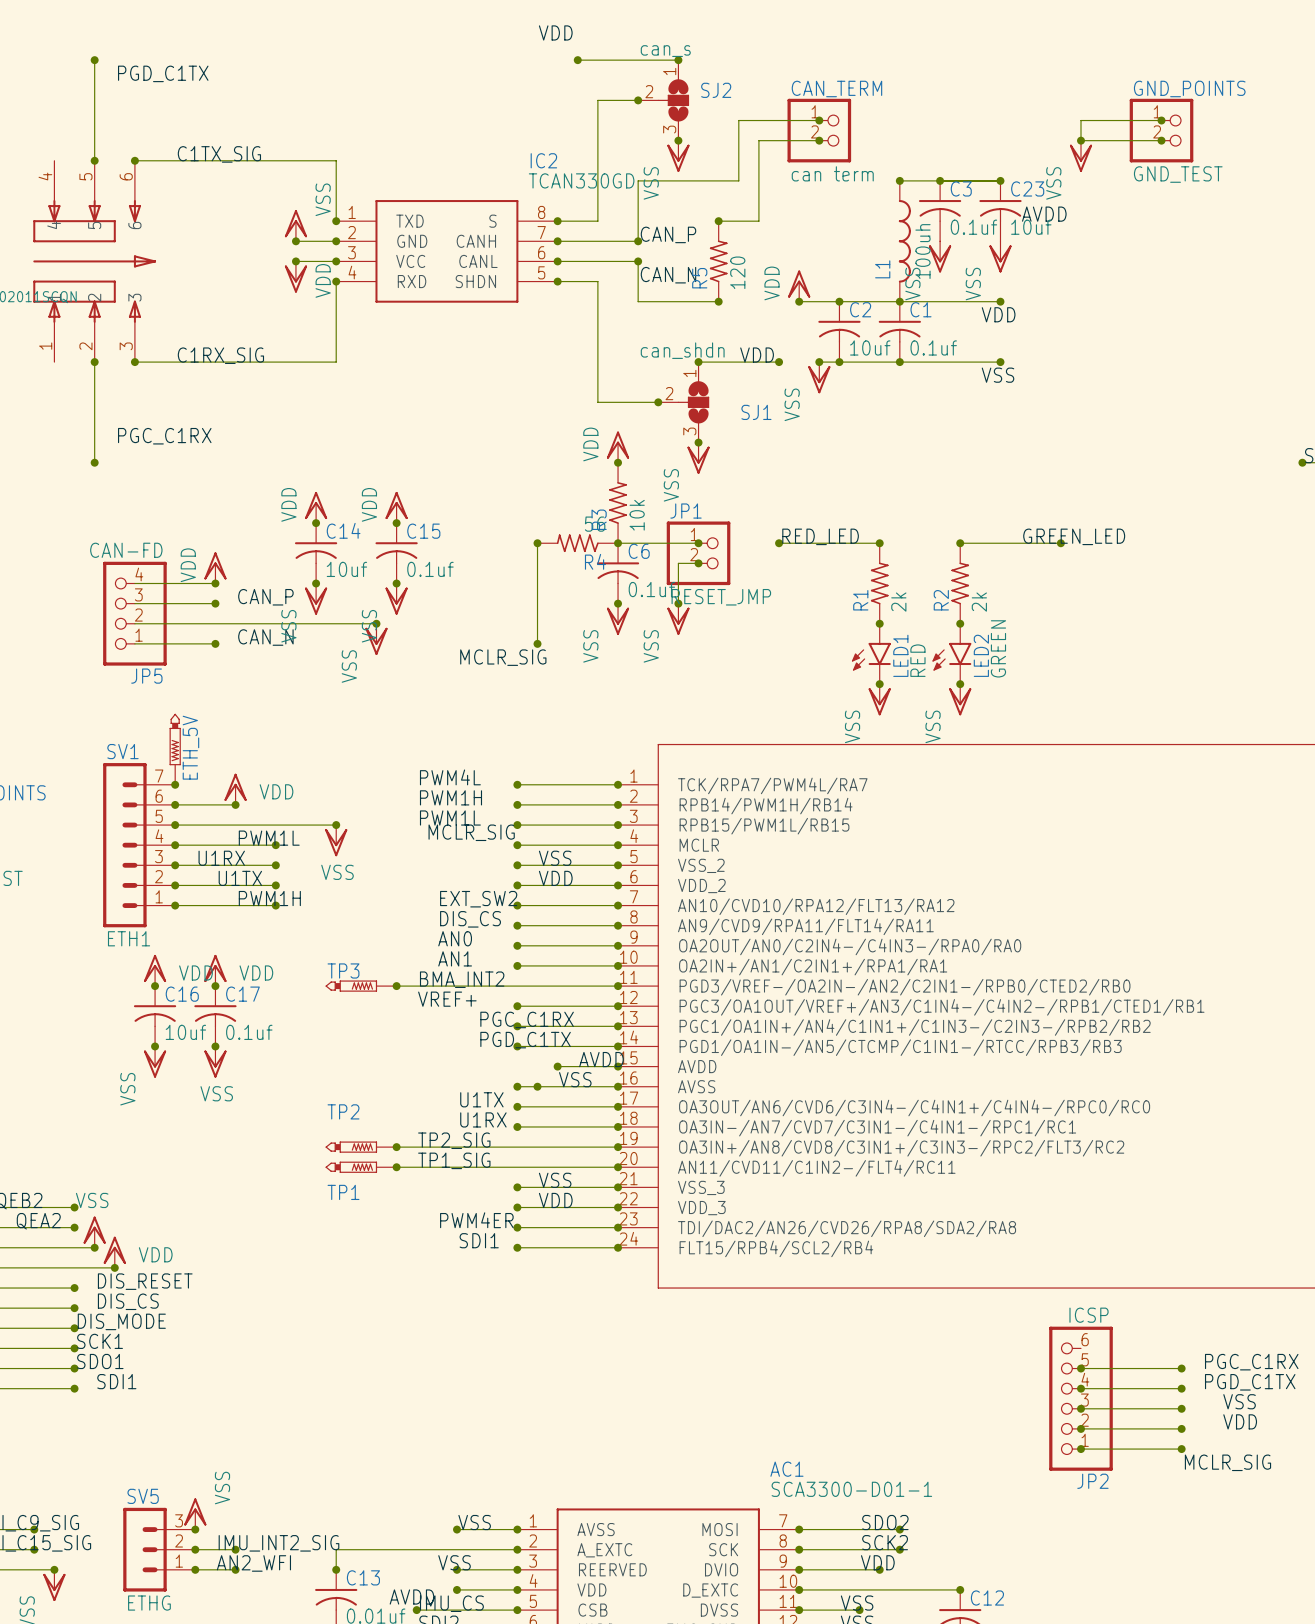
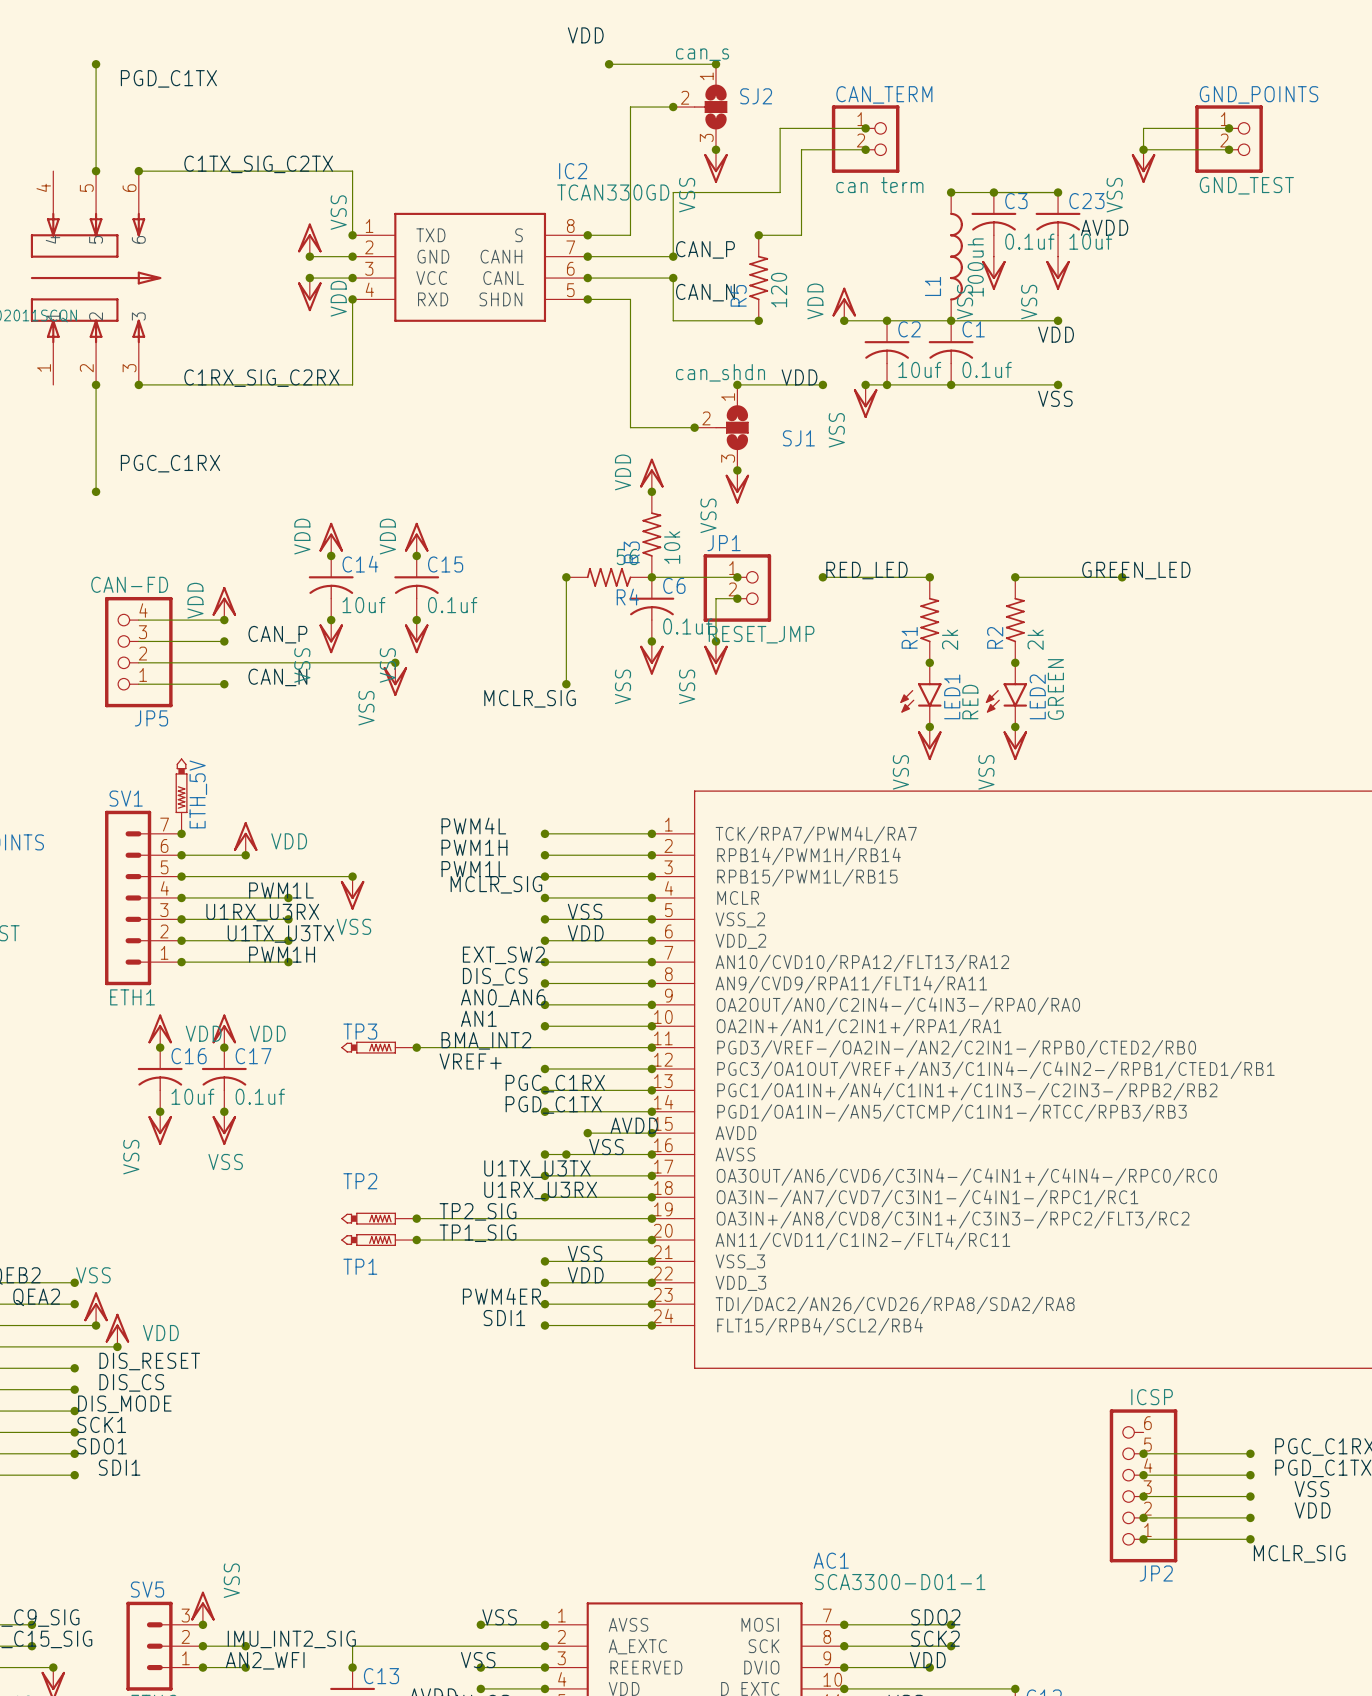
label: C1TX_SIG (219, 154) -> C1TX_SIG_C2TX (258, 164)
label: C1RX_SIG (220, 355) -> C1RX_SIG_C2RX (261, 378)
label: U1RX (221, 858) -> U1RX_U3RX (262, 912)
label: U1TX (240, 878) -> U1TX_U3TX (280, 933)
label: AN0 (455, 938) -> AN0_AN6 (503, 998)
label: U1TX (481, 1099) -> U1TX_U3TX (537, 1169)
label: U1RX (483, 1119) -> U1RX_U3RX (540, 1190)

